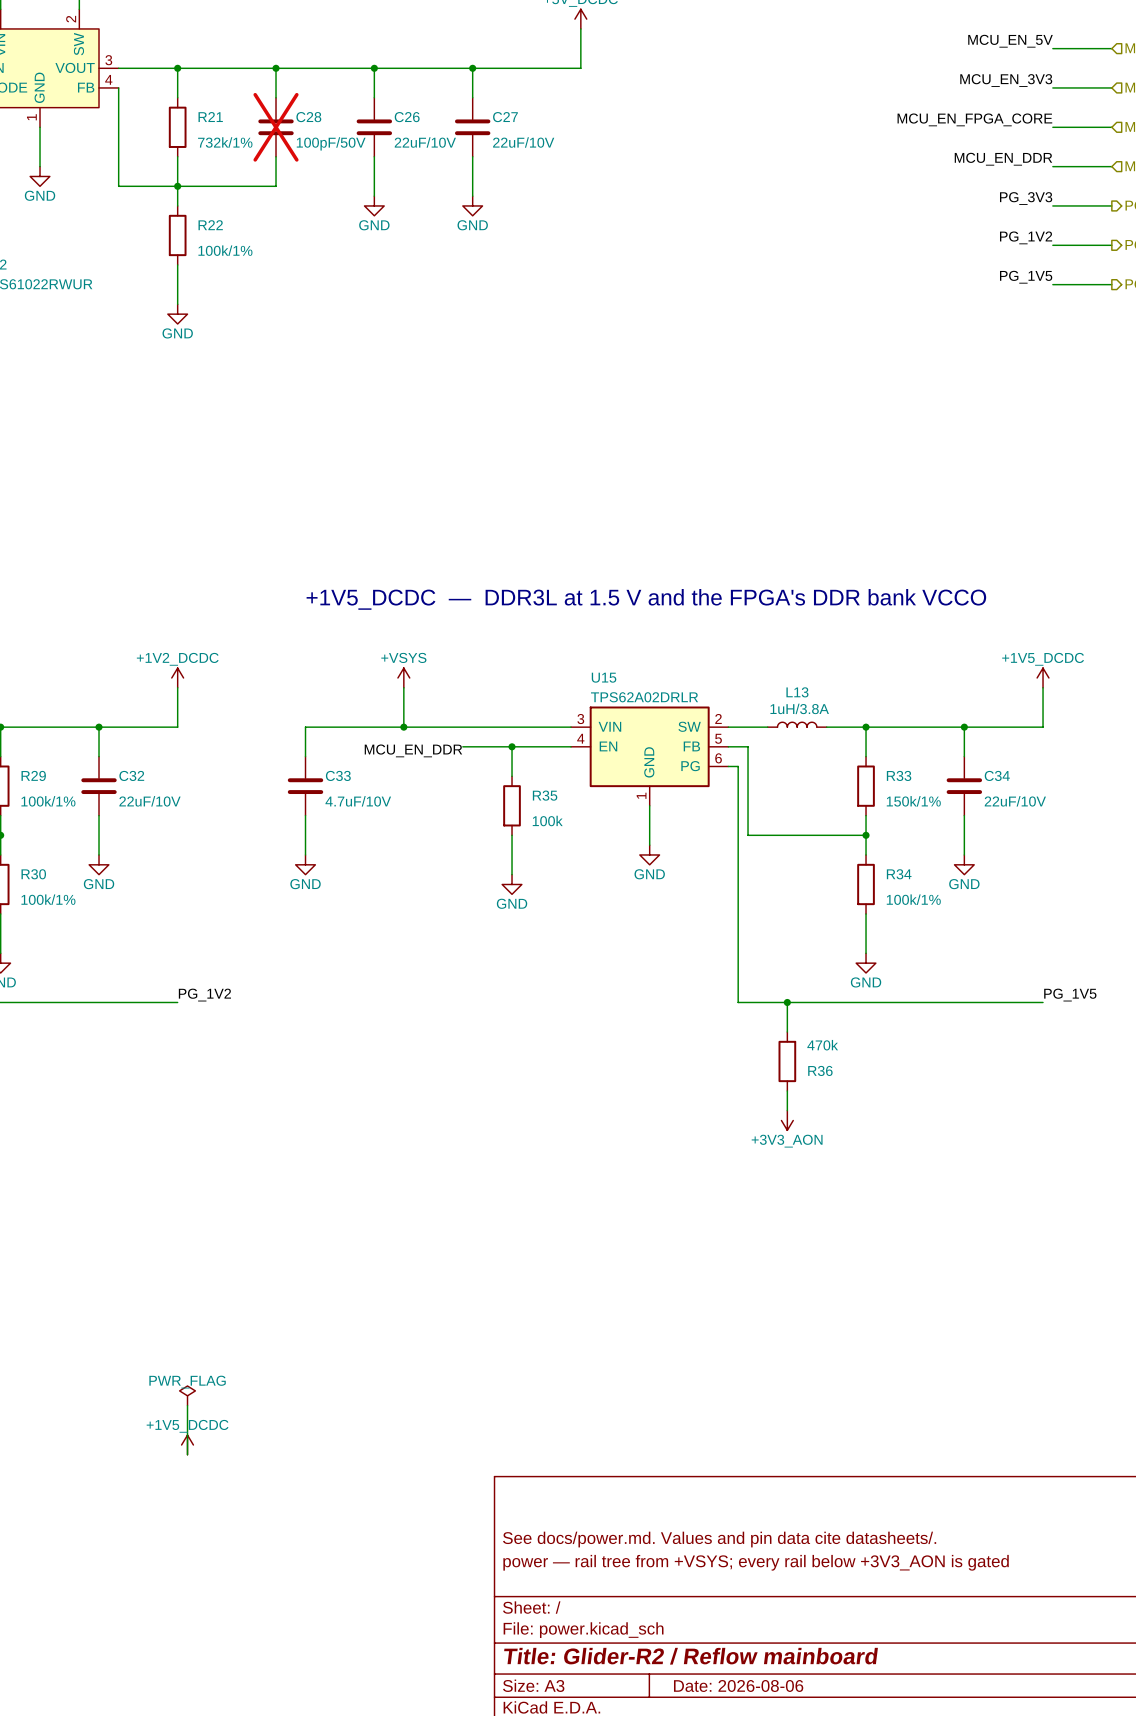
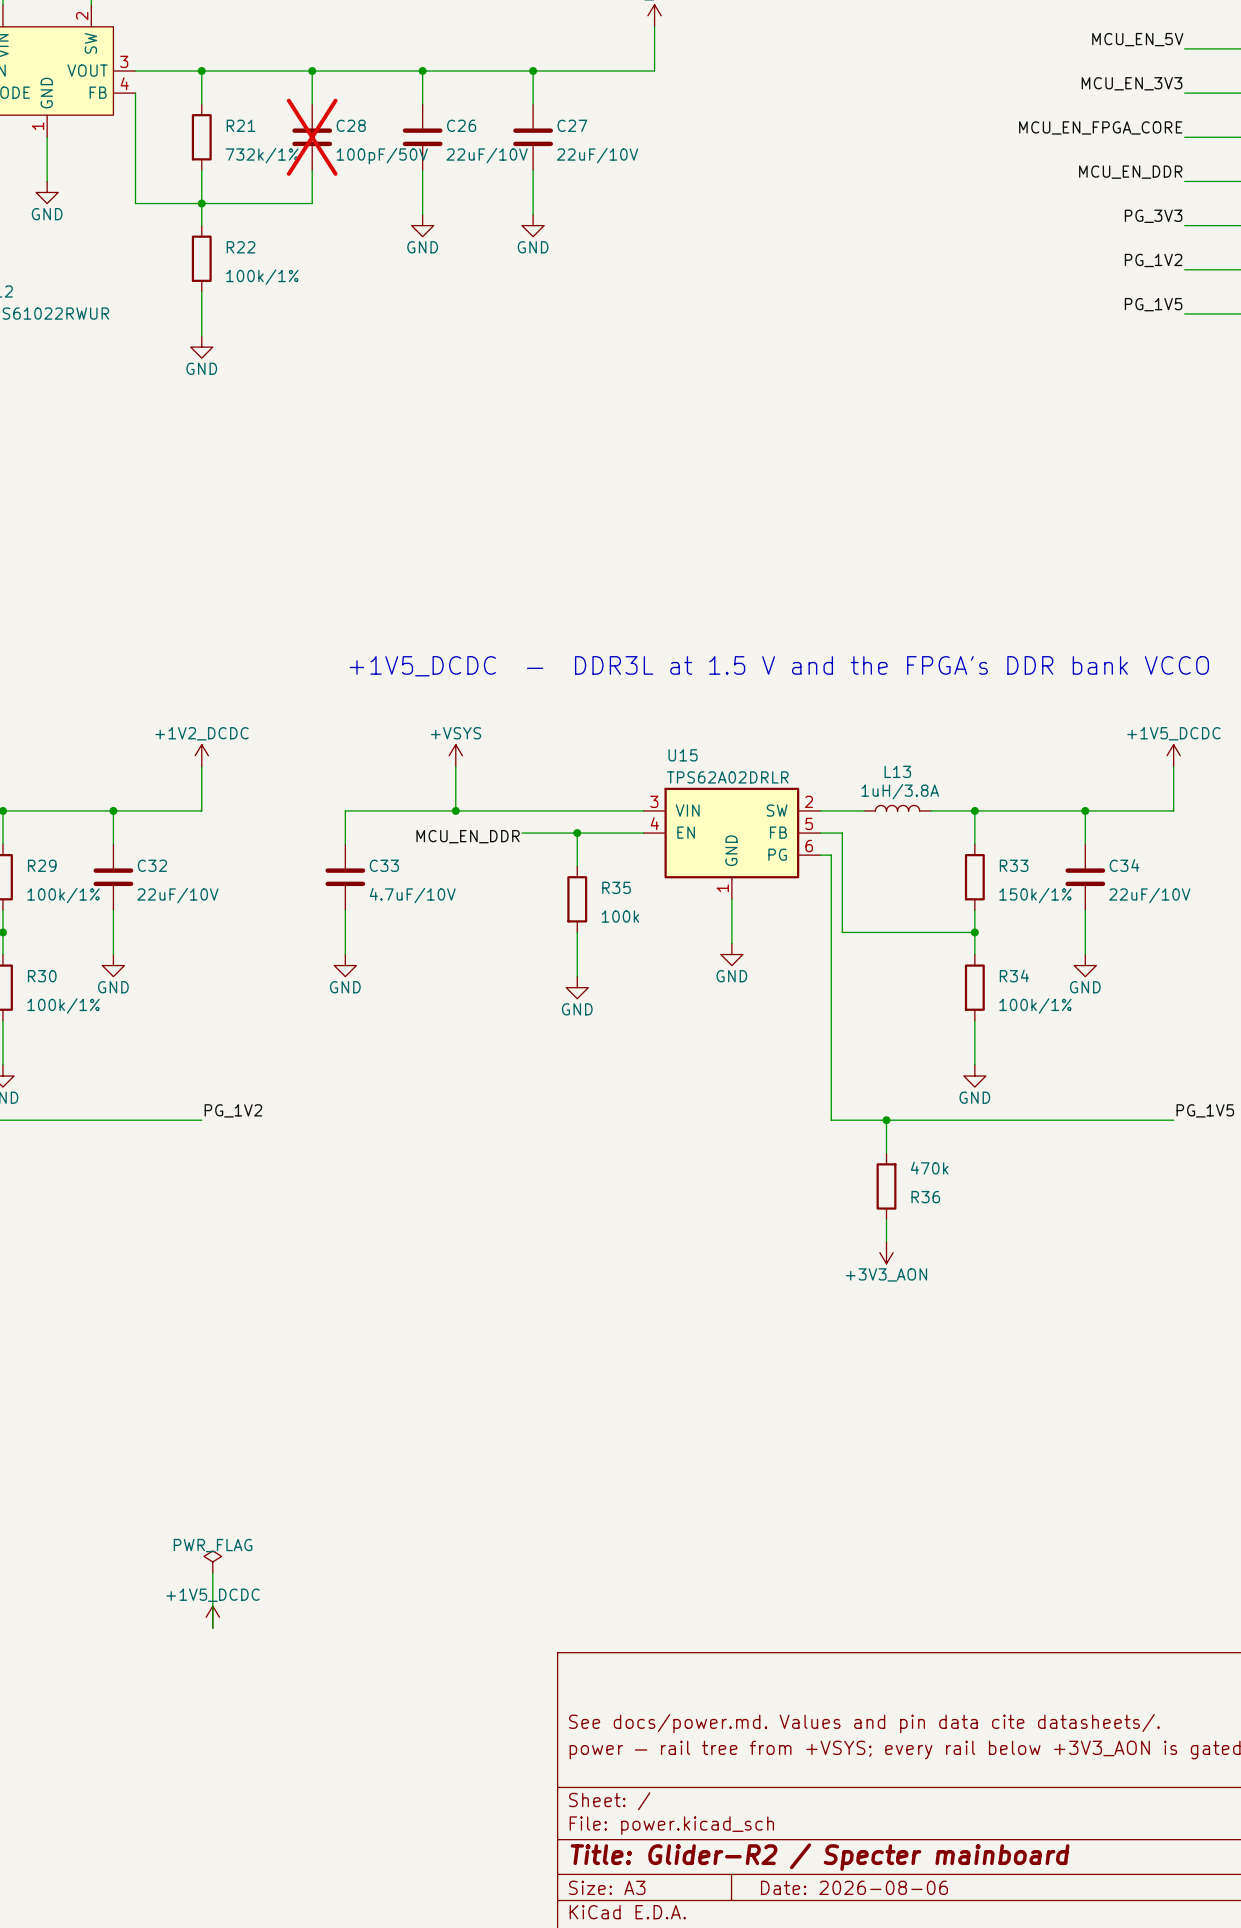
title block: Title: Glider-R2 / Reflow mainboard (691, 1656) -> Title: Glider-R2 / Specter mainboard (820, 1857)

